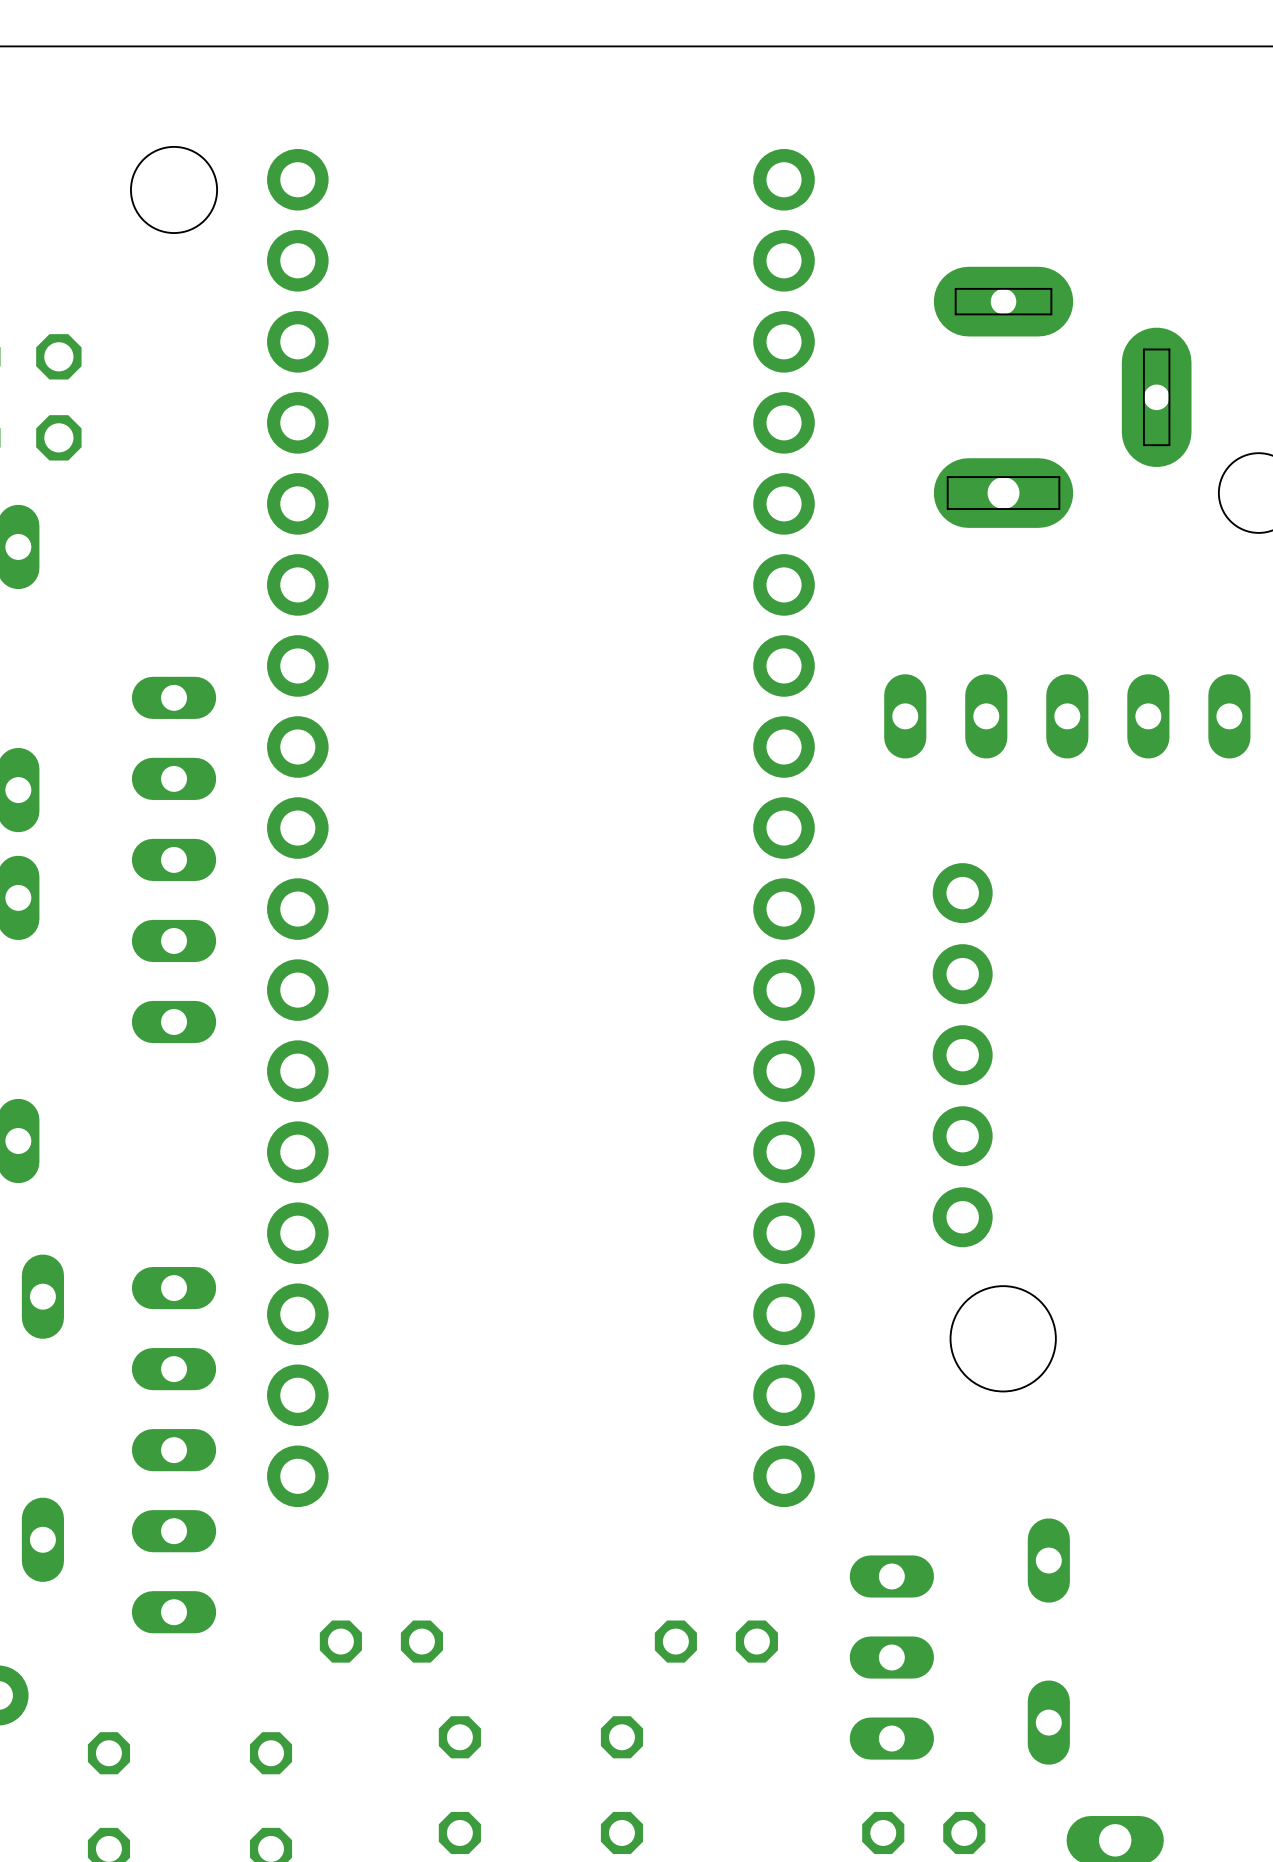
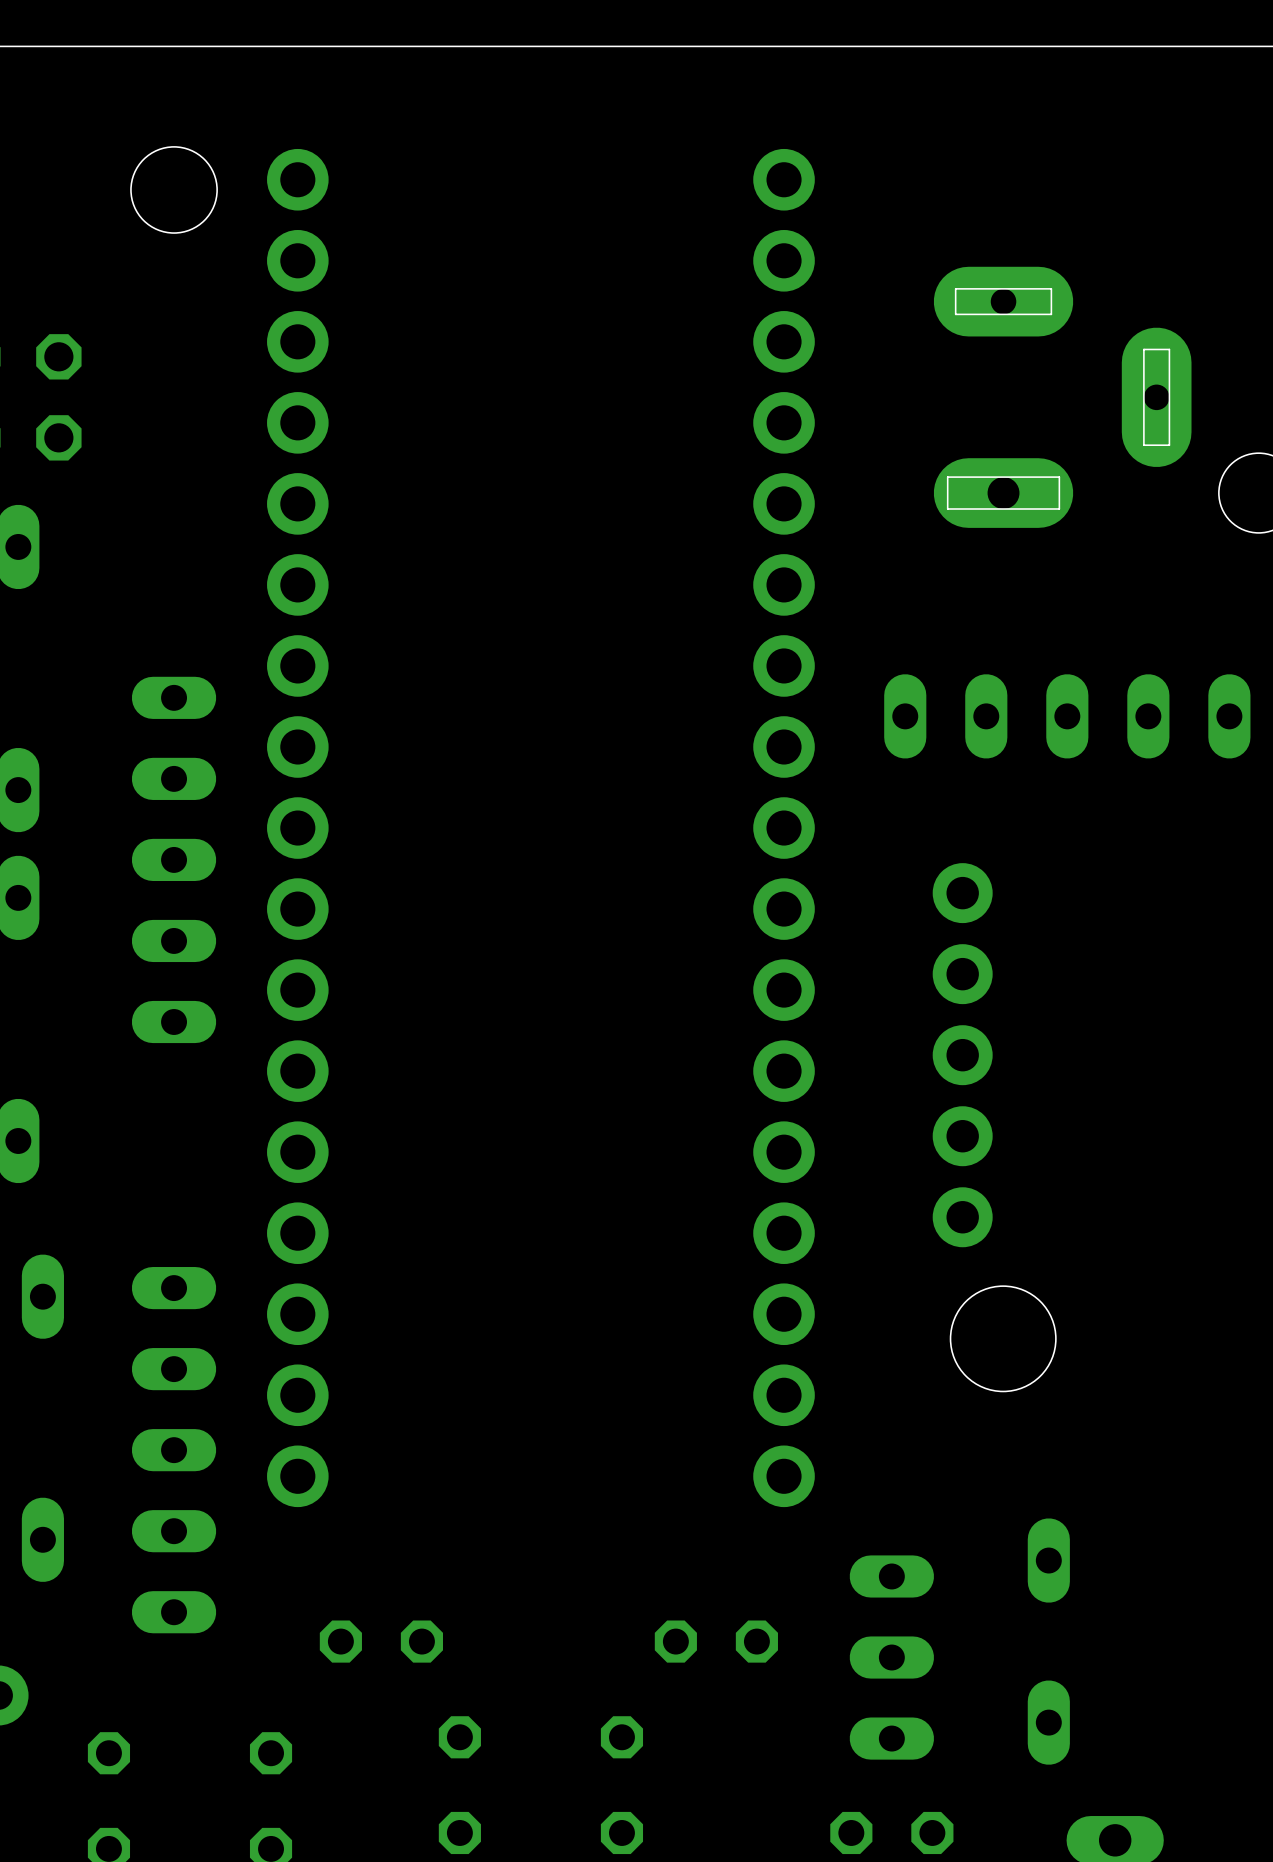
part position: (923, 1832) -> (891, 1832)

